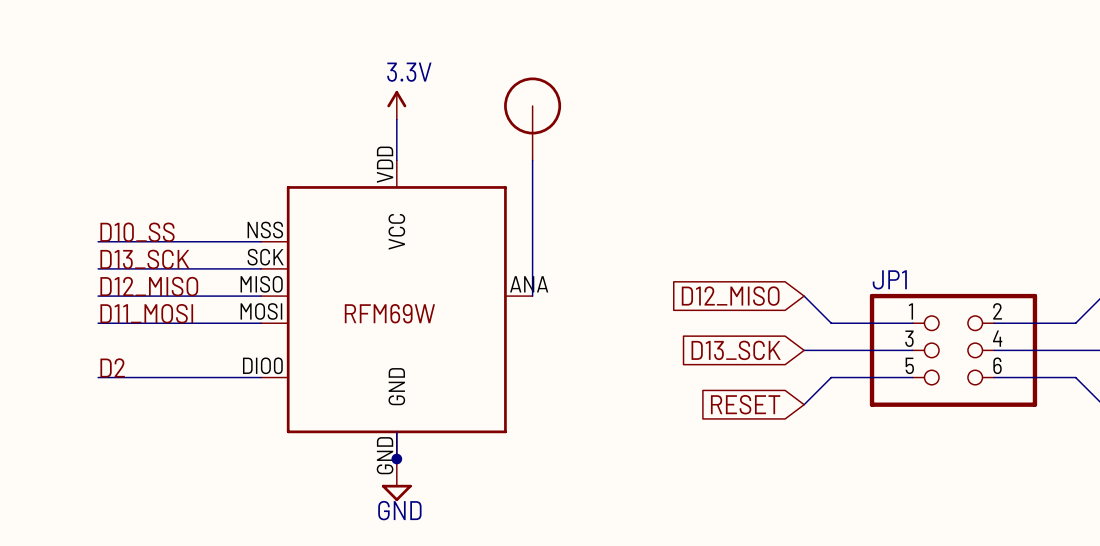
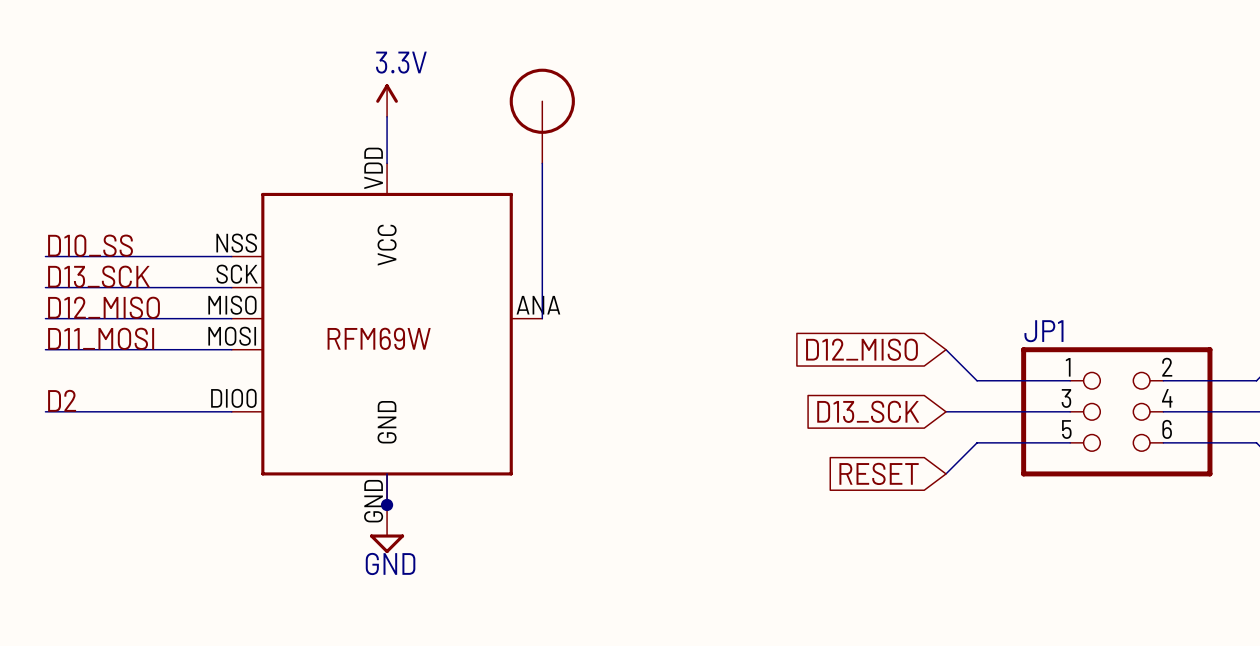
power symbol position: 3.3V (396, 105) -> 3.3V (387, 100)
part position: (532, 118) -> (542, 116)
wire: (396, 119) (396, 160) -> (387, 116) (387, 163)
wire: (532, 160) (532, 296) -> (542, 163) (542, 318)
label position: D10_SS (137, 232) -> D10_SS (90, 245)
wire: (179, 241) (261, 241) -> (45, 287) (138, 287)
label position: D13_SCK (144, 259) -> D13_SCK (99, 276)
wire: (179, 268) (261, 268) -> (45, 318) (138, 318)
label position: D12_MISO (149, 286) -> D12_MISO (104, 307)
wire: (179, 296) (261, 296) -> (45, 349) (138, 349)
part position: (396, 309) -> (387, 334)
label position: D11_MOSI (146, 313) -> D11_MOSI (101, 338)
wire: (98, 323) (261, 323) -> (45, 256) (231, 256)
label position: D2 (112, 367) -> D2 (62, 400)
wire: (98, 377) (261, 377) -> (45, 411) (231, 411)
junction: none -> (387, 504)
wire: (396, 431) (396, 459) -> (387, 473) (387, 504)
junction: (396, 459) -> none
power symbol position: GND (396, 480) -> GND (387, 529)

